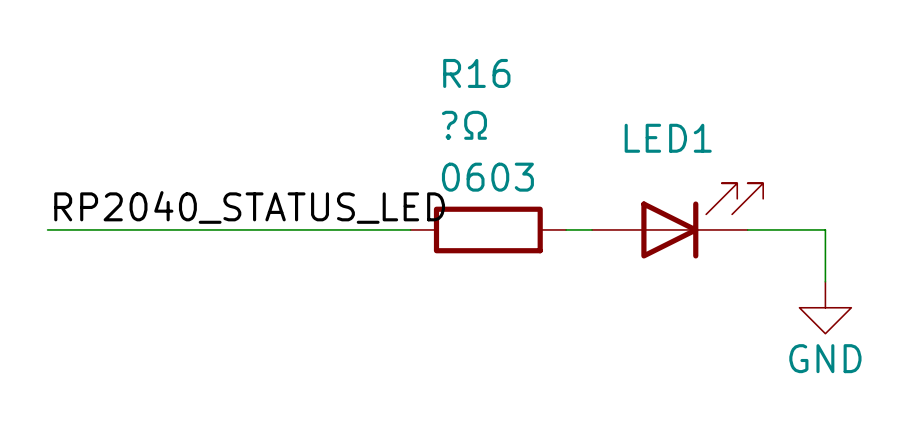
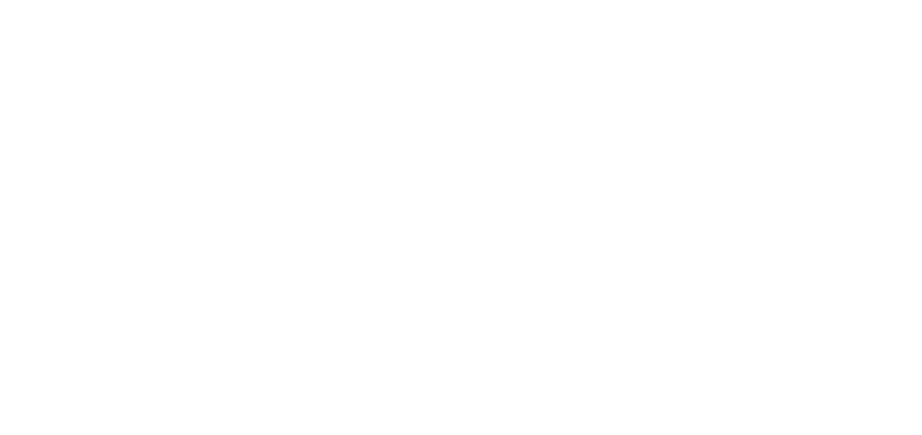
label: RP2040_STATUS_LED (249, 207) -> none
LED1: (677, 220) -> none
wire: (47, 229) (410, 229) -> none
R16: ?Ω (488, 229) -> none
wire: (566, 229) (592, 229) -> none
wire: (747, 229) (825, 229) (825, 281) -> none
power symbol: GND (825, 307) -> none

